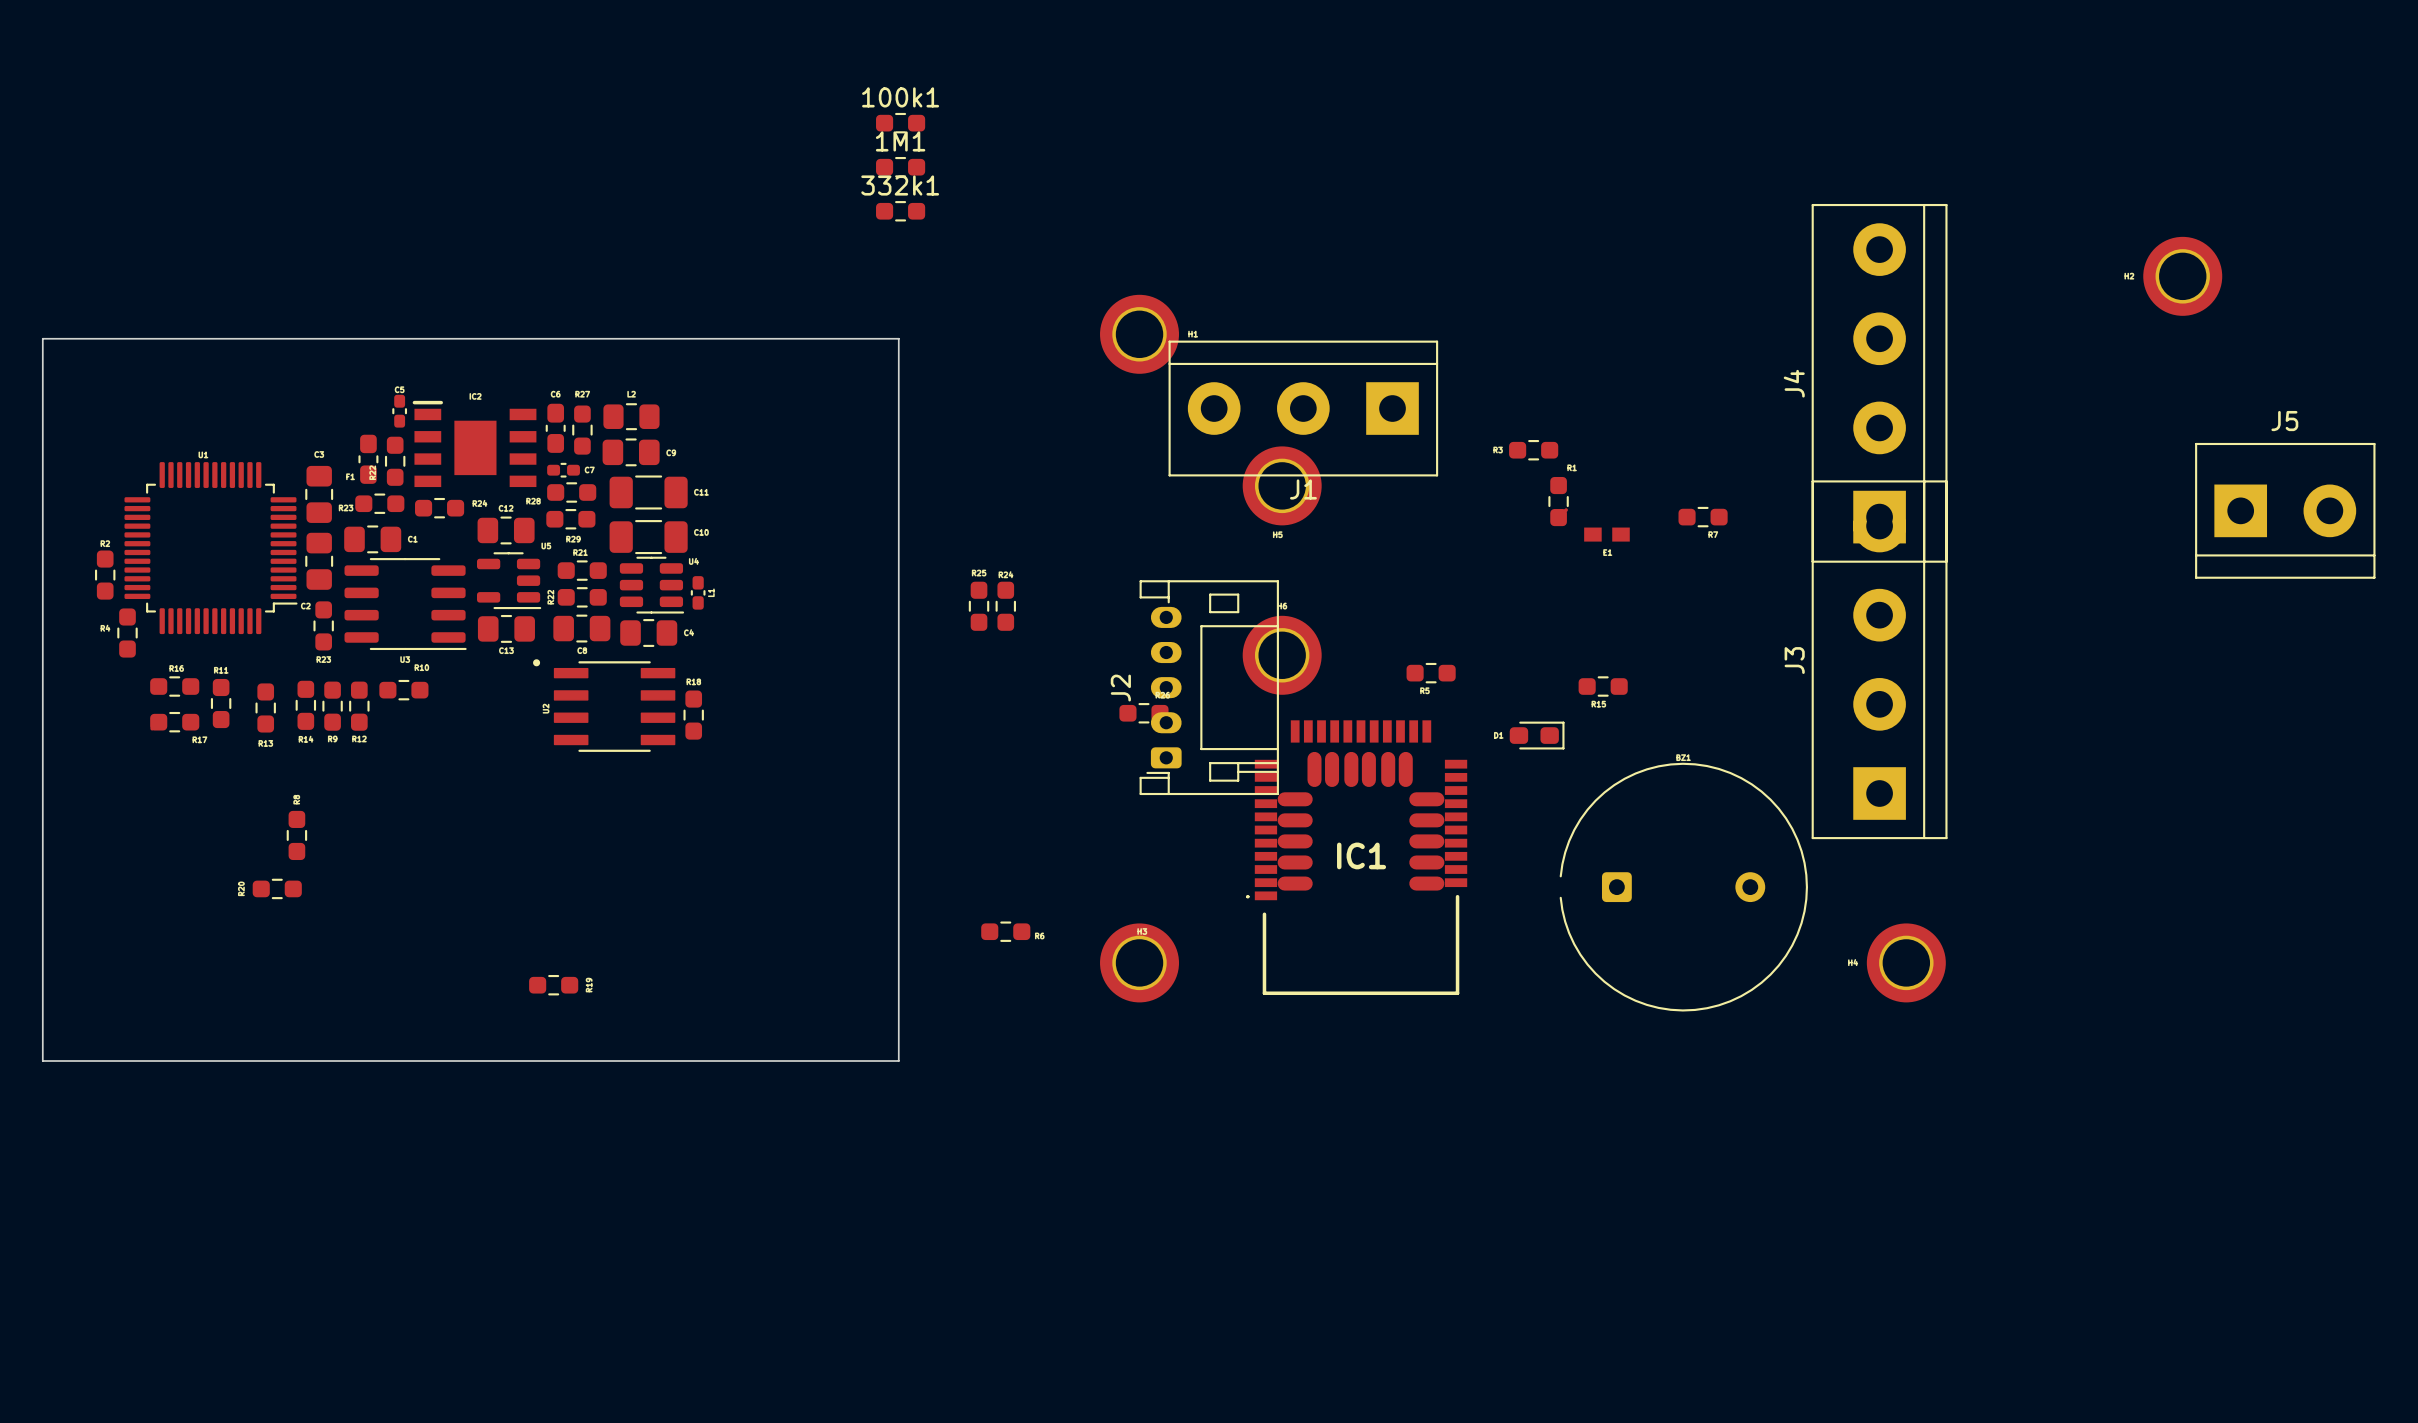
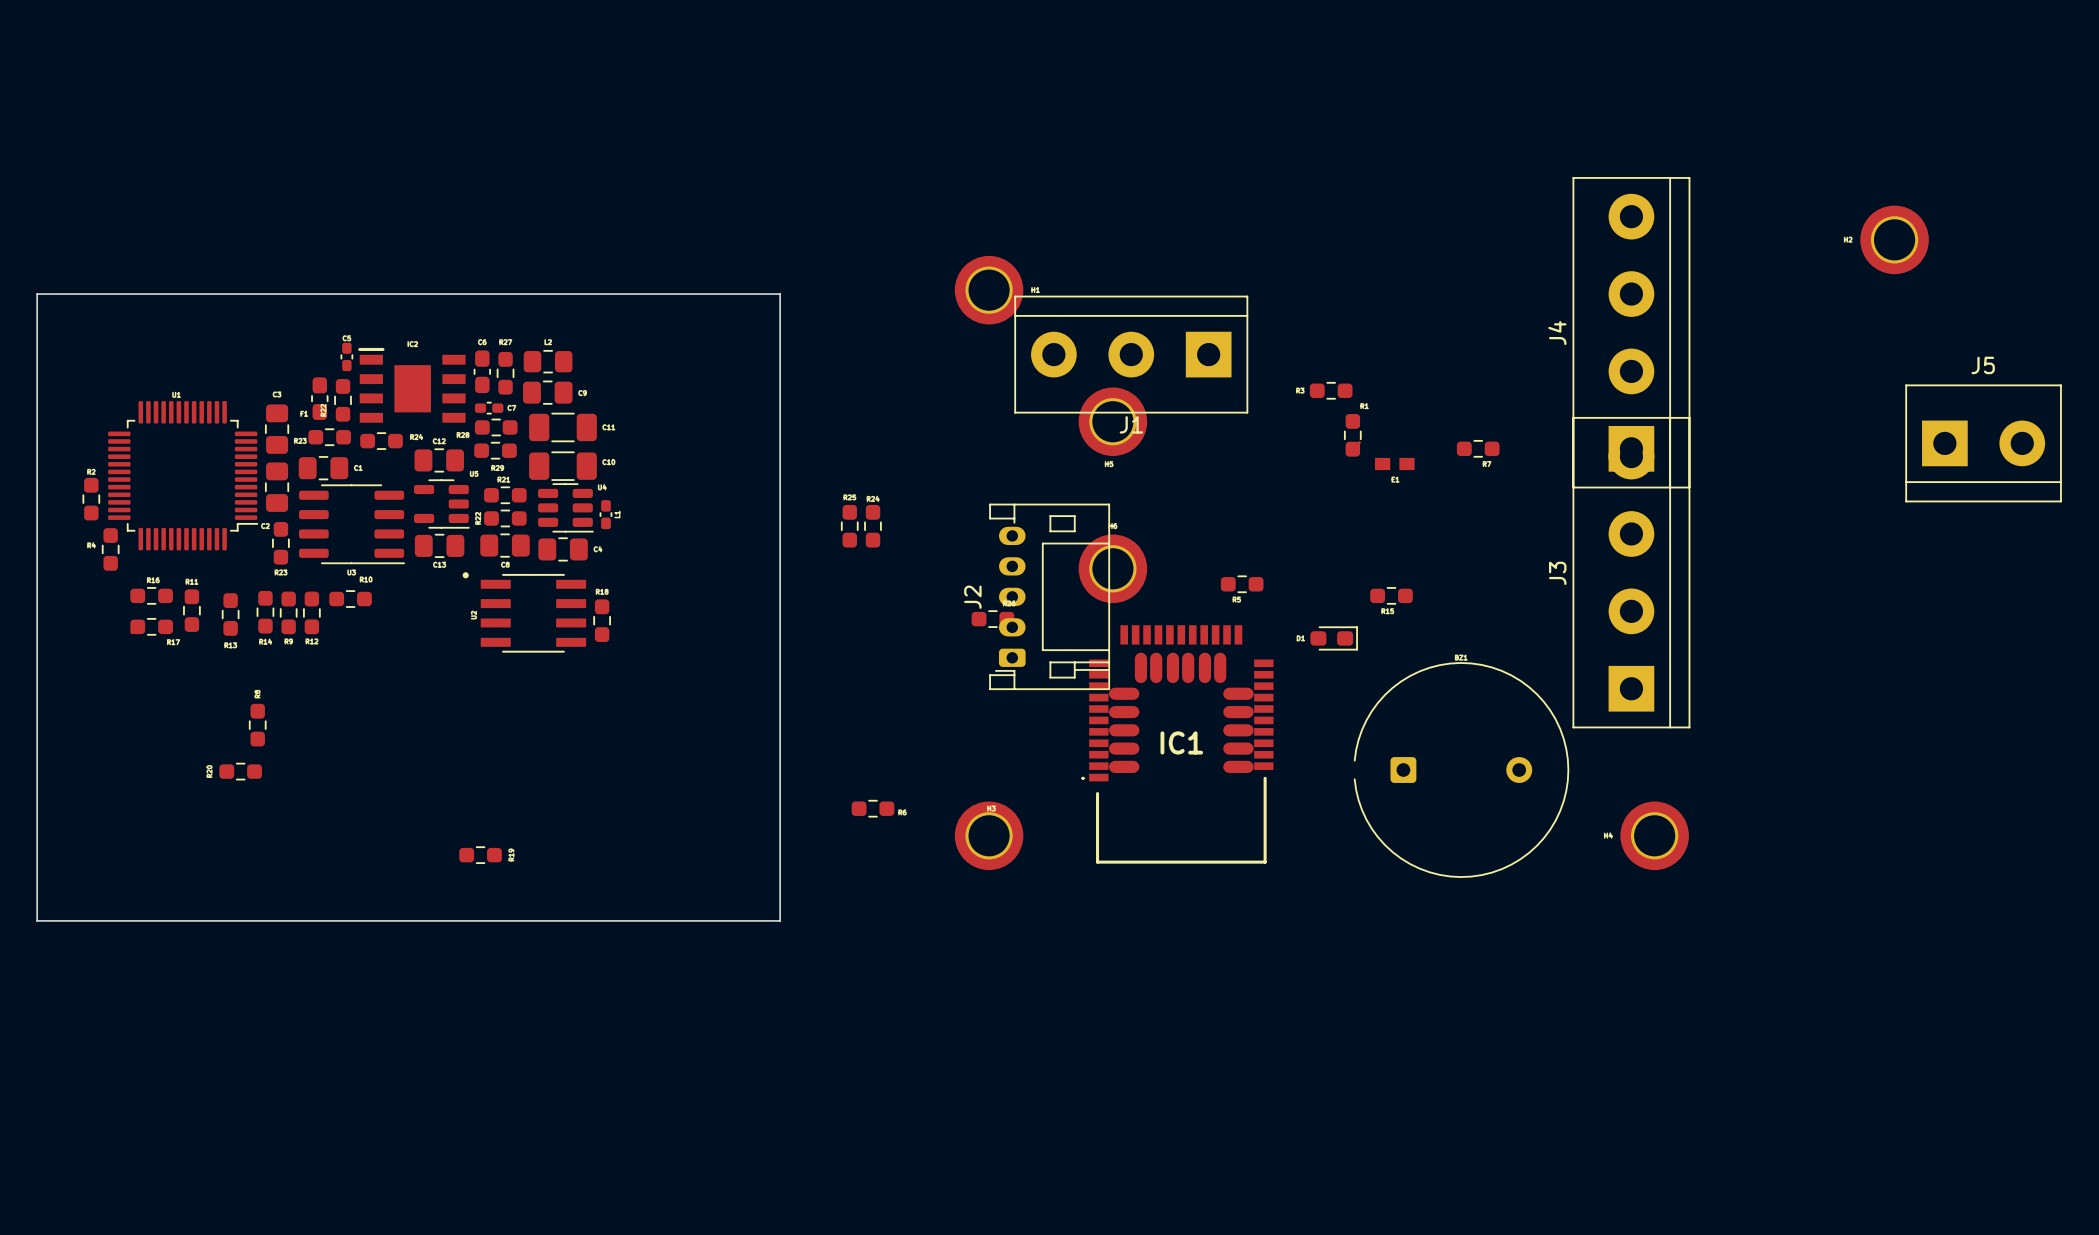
100k1: (900, 123) -> none
1M1: (900, 167) -> none
332k1: (900, 211) -> none

